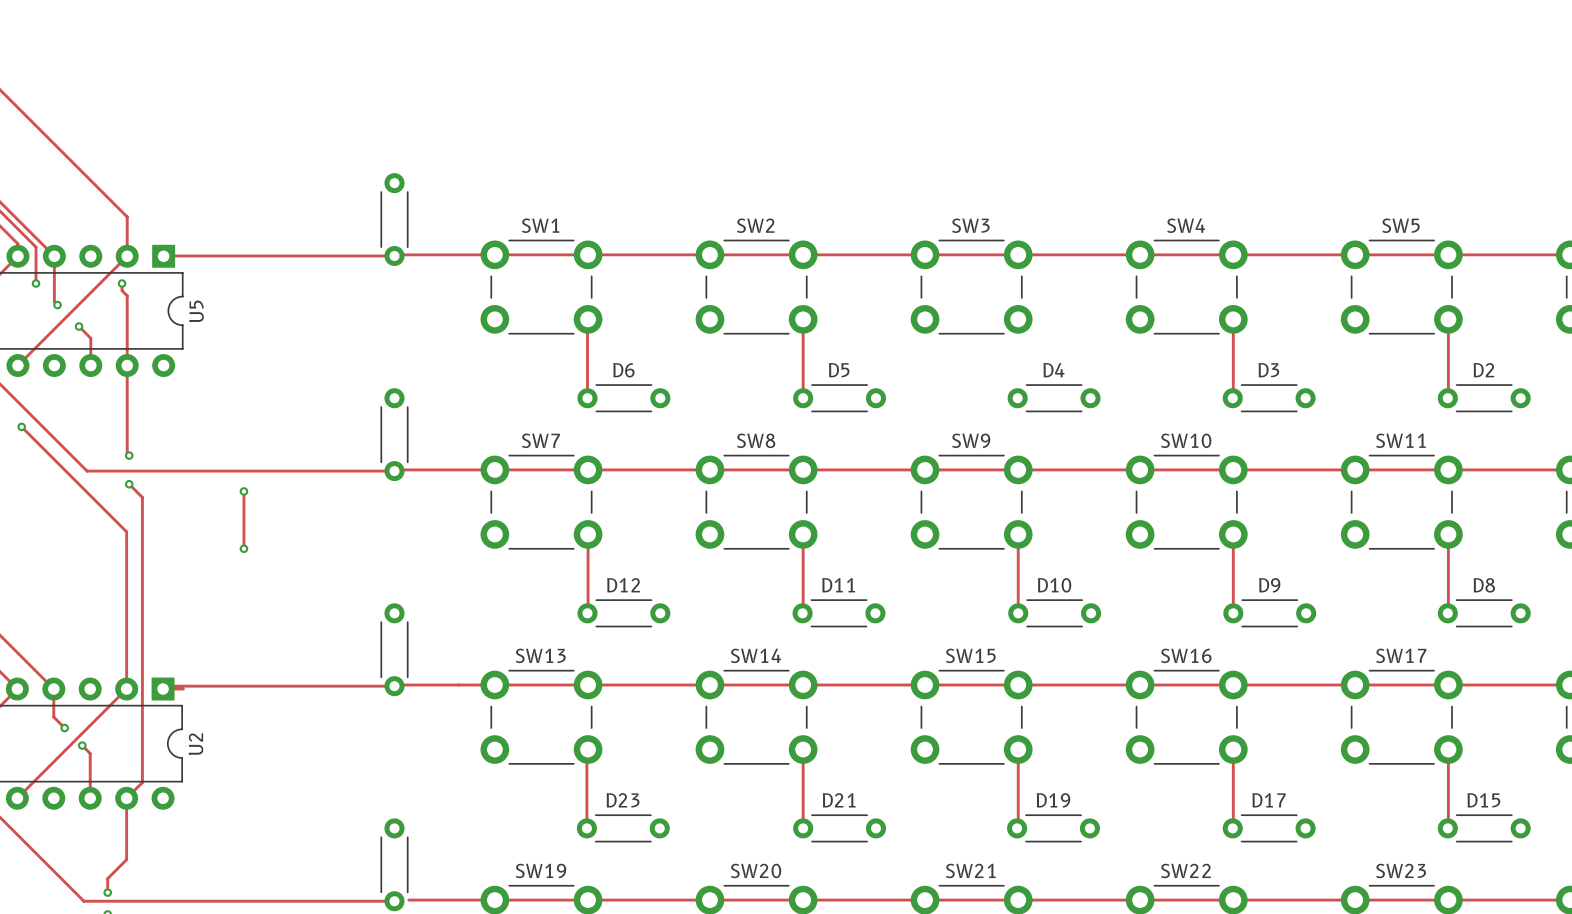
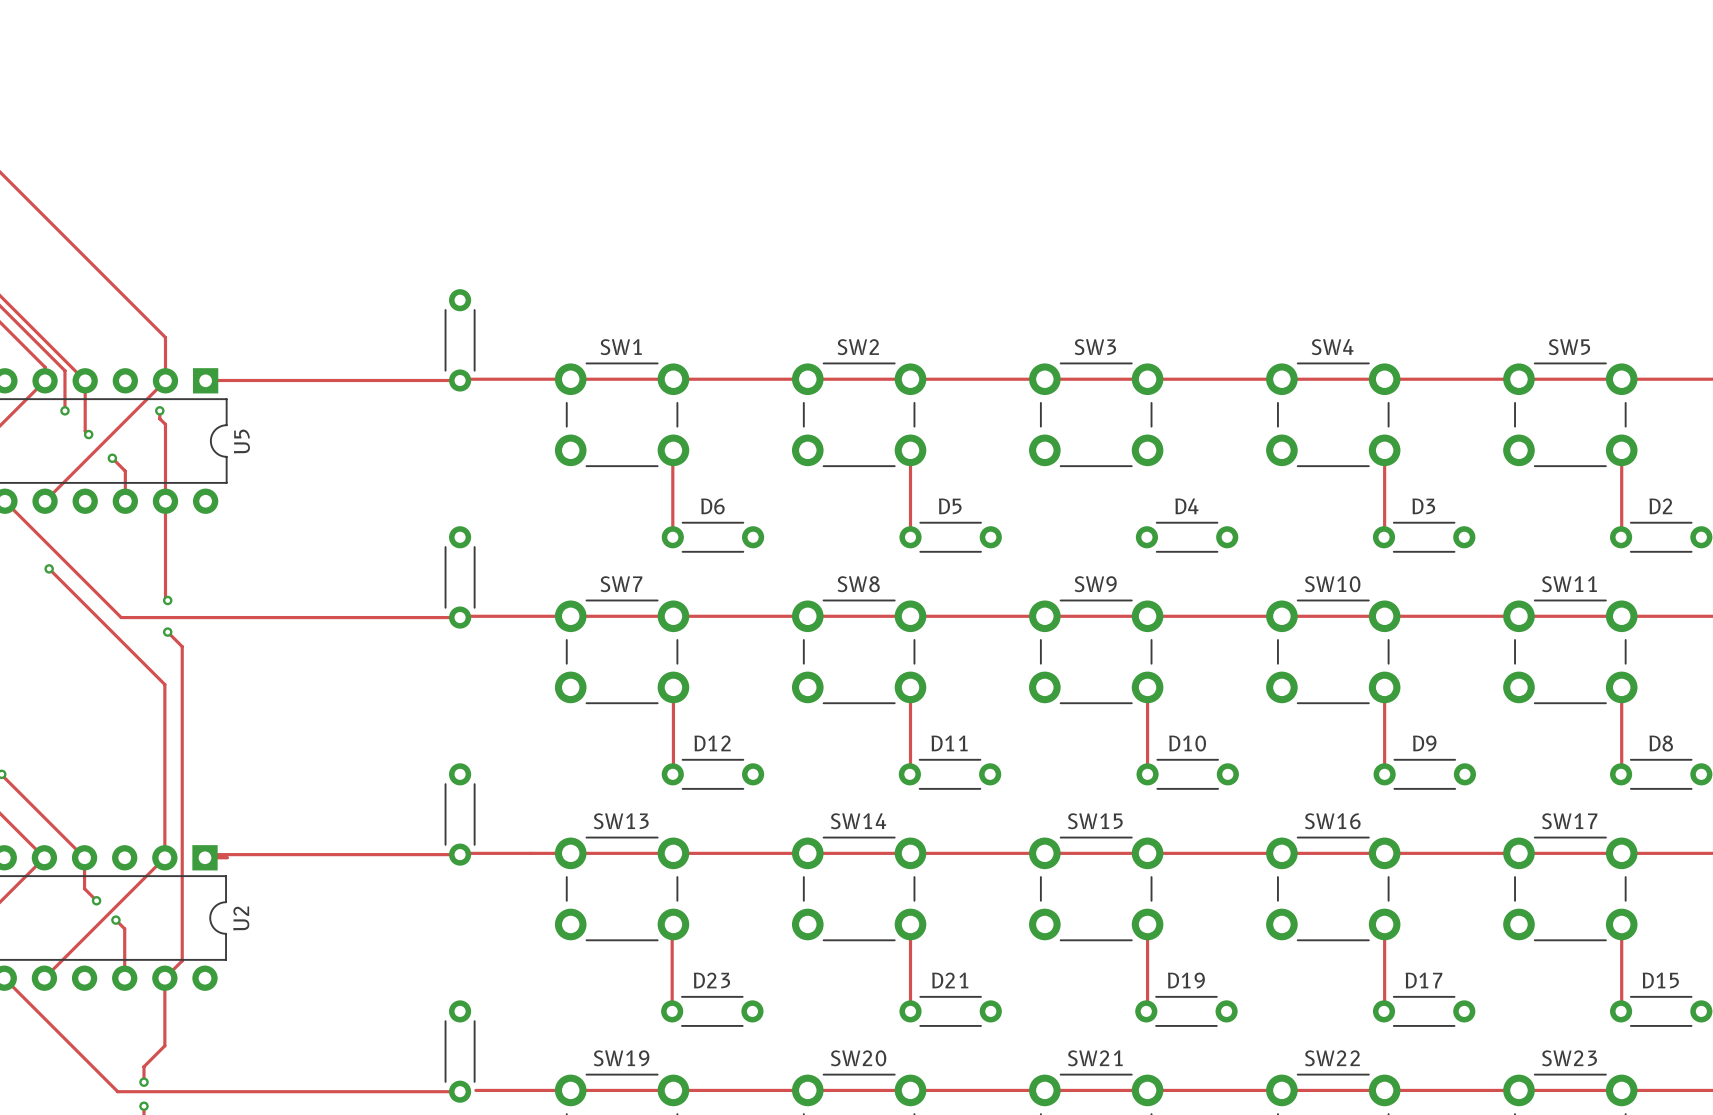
track: (243, 491) (243, 548) -> none
via: (243, 491) -> none
via: (243, 548) -> none

